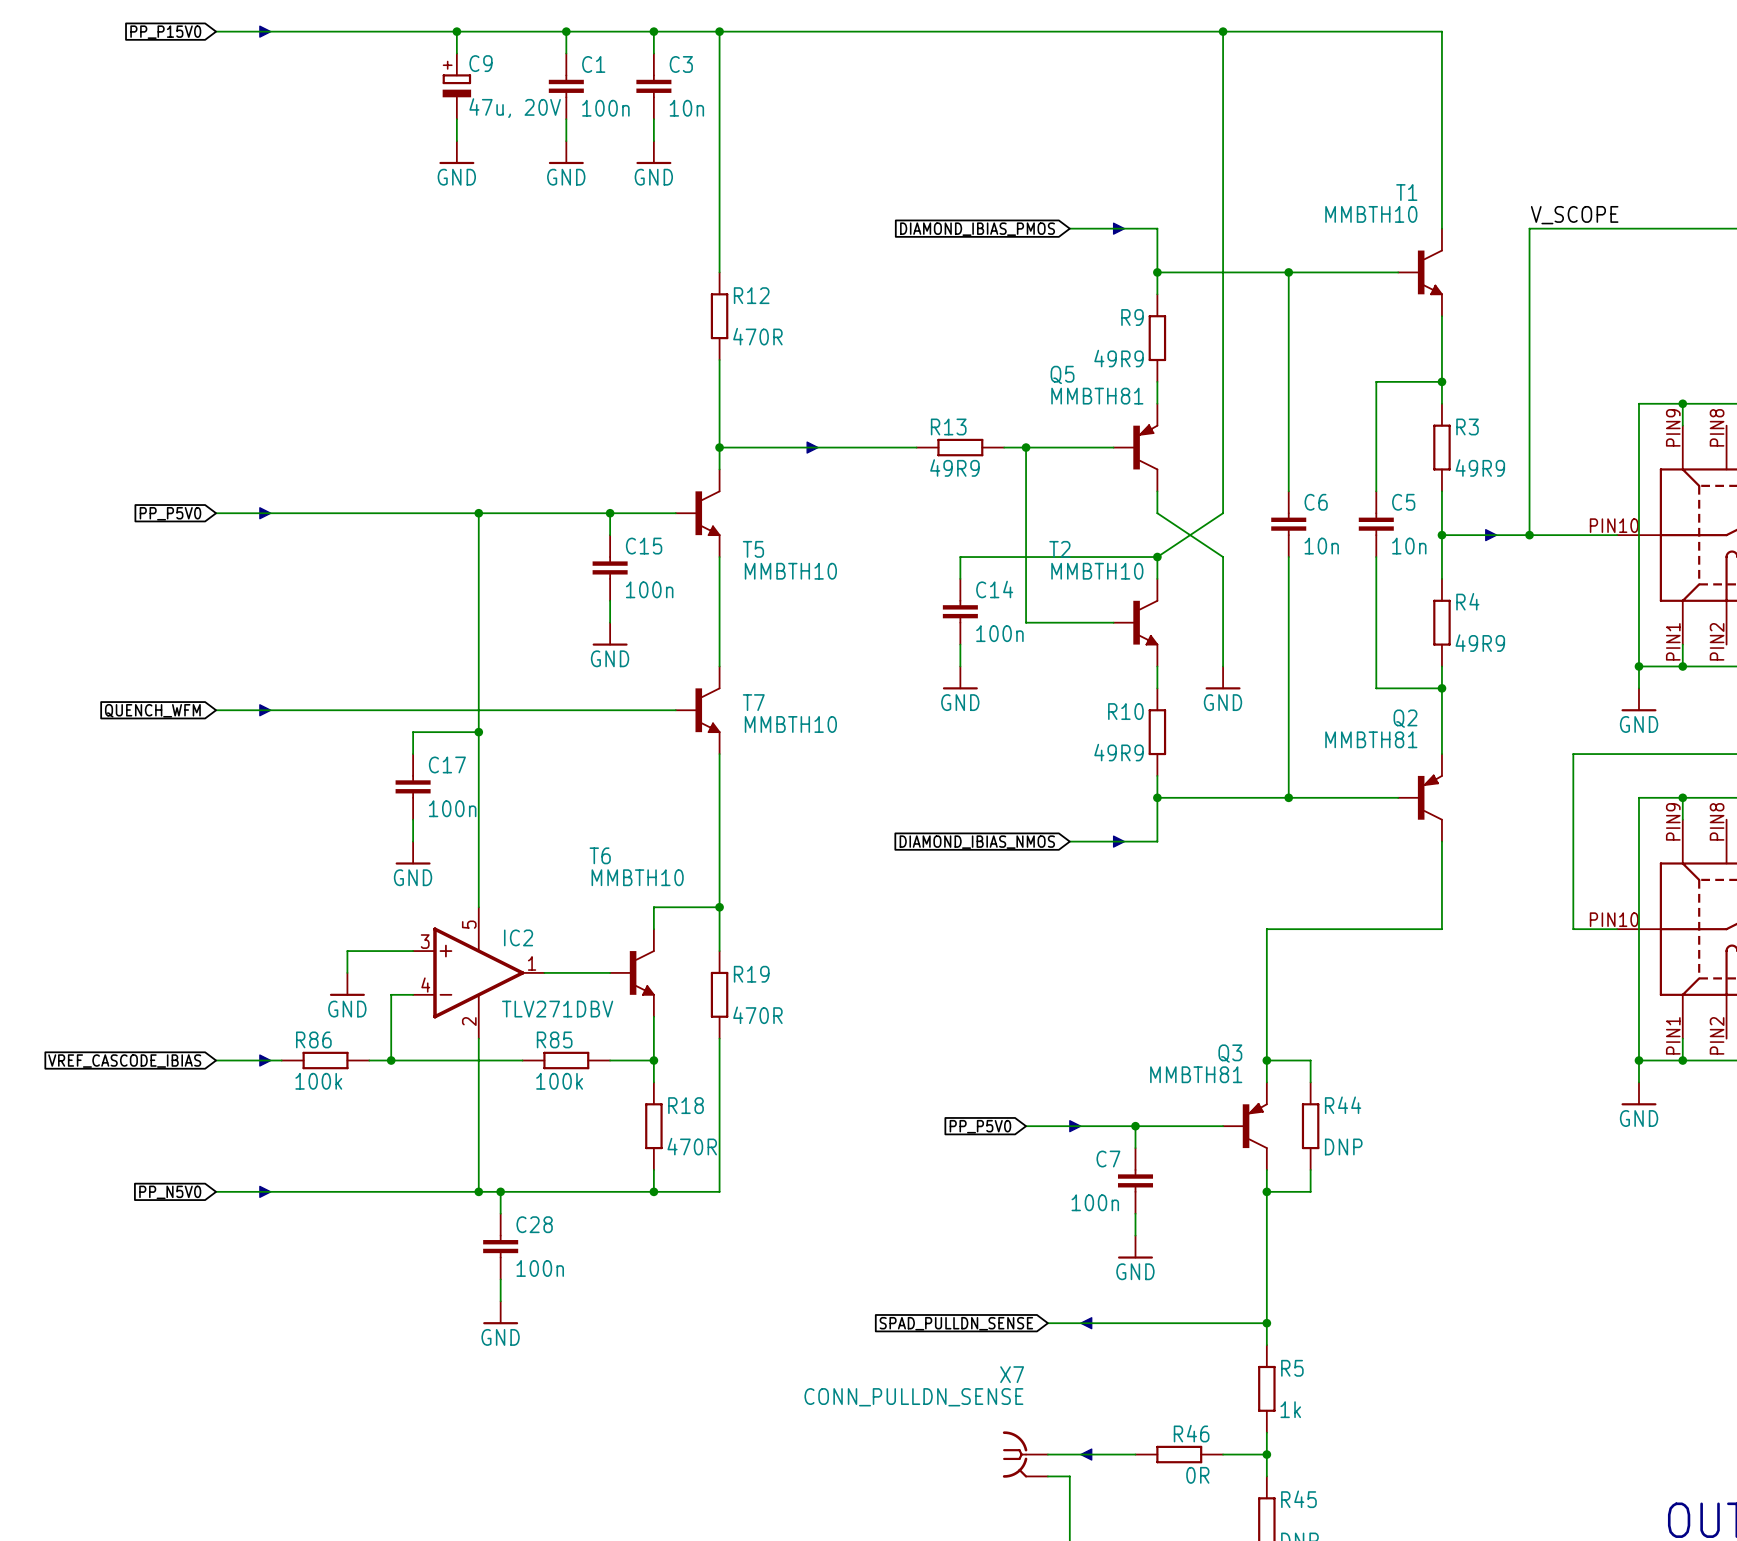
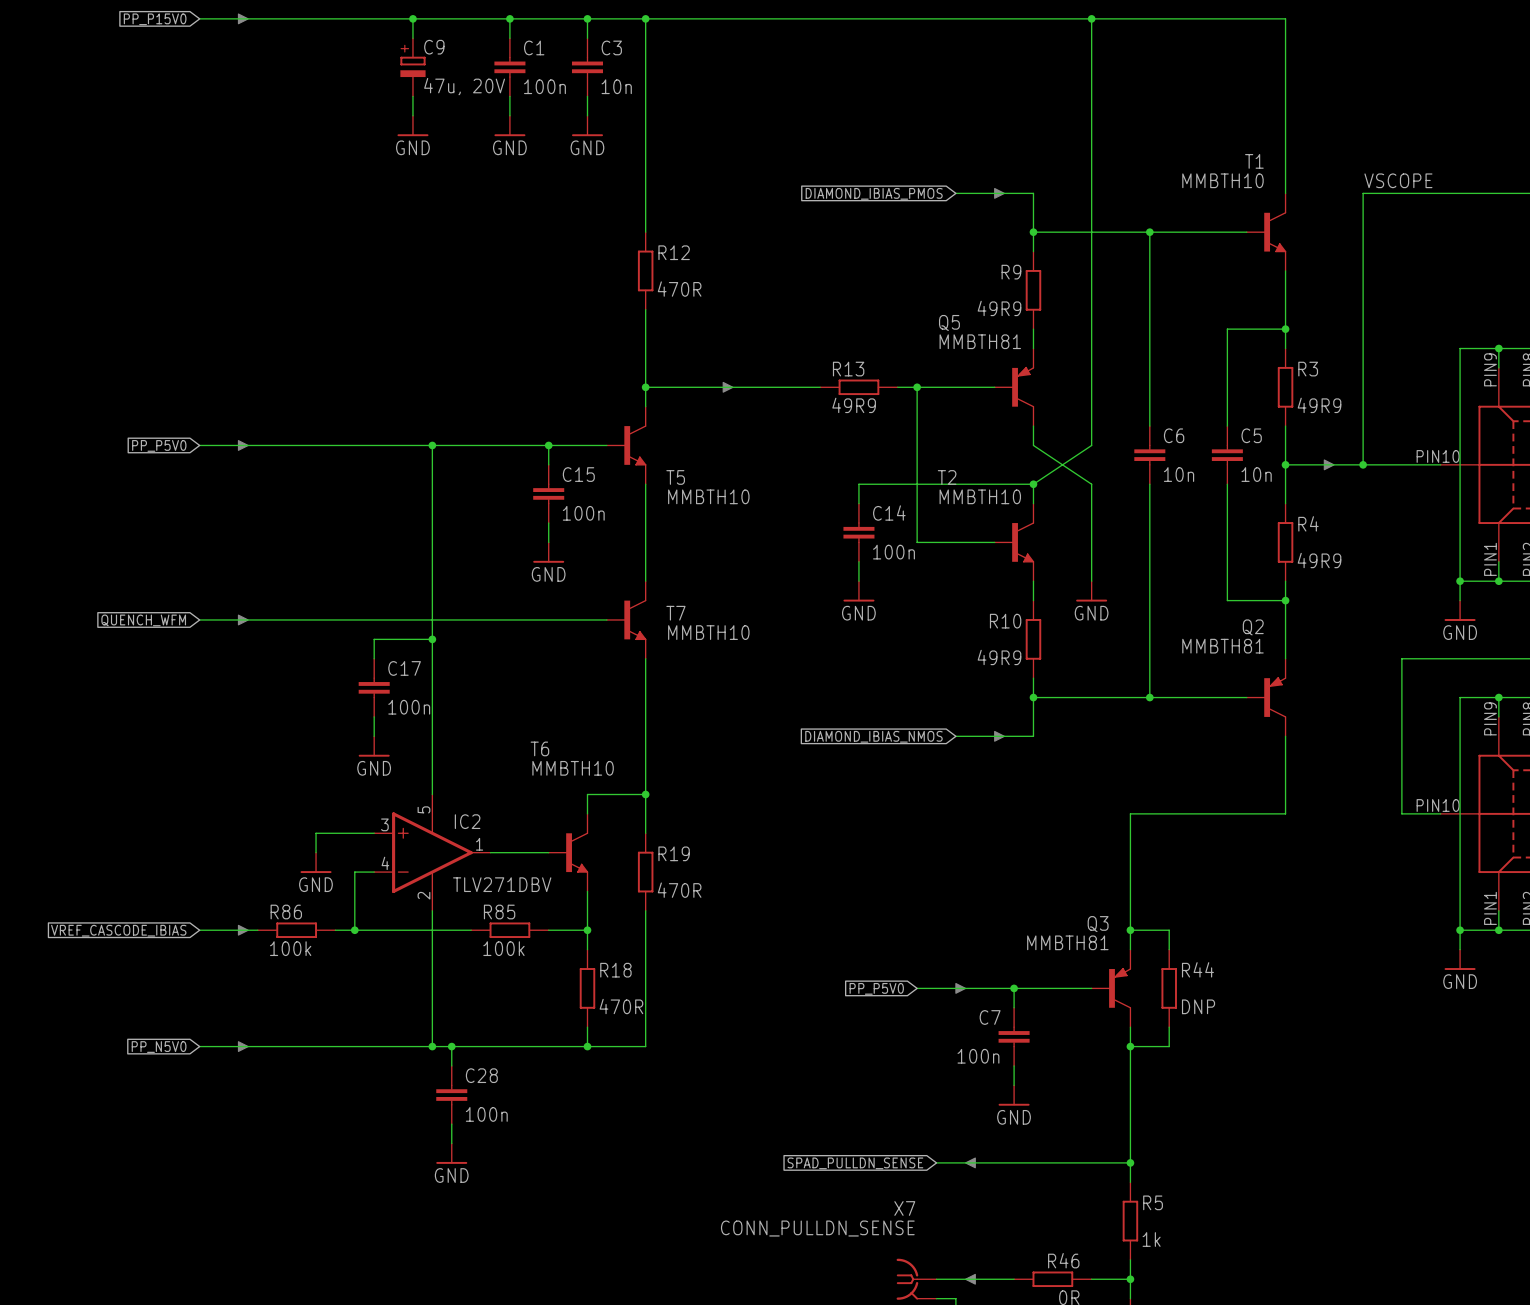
label: V_SCOPE (1574, 215) -> VSCOPE (1398, 180)

